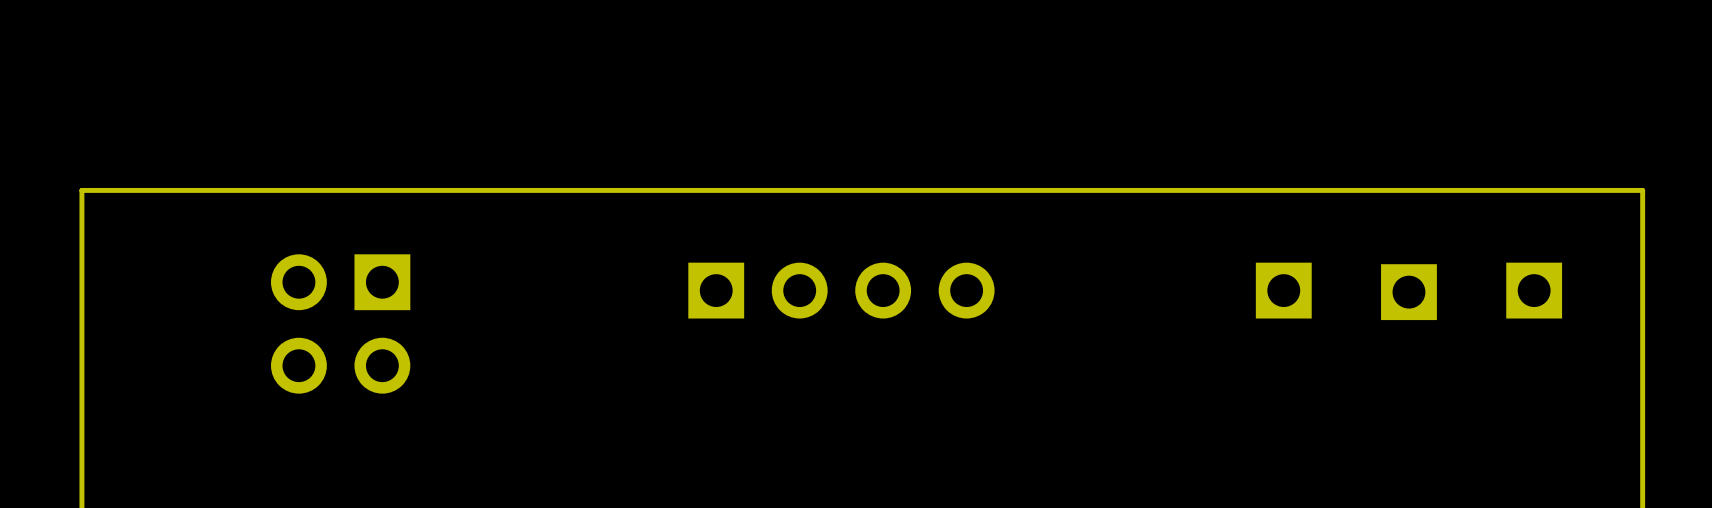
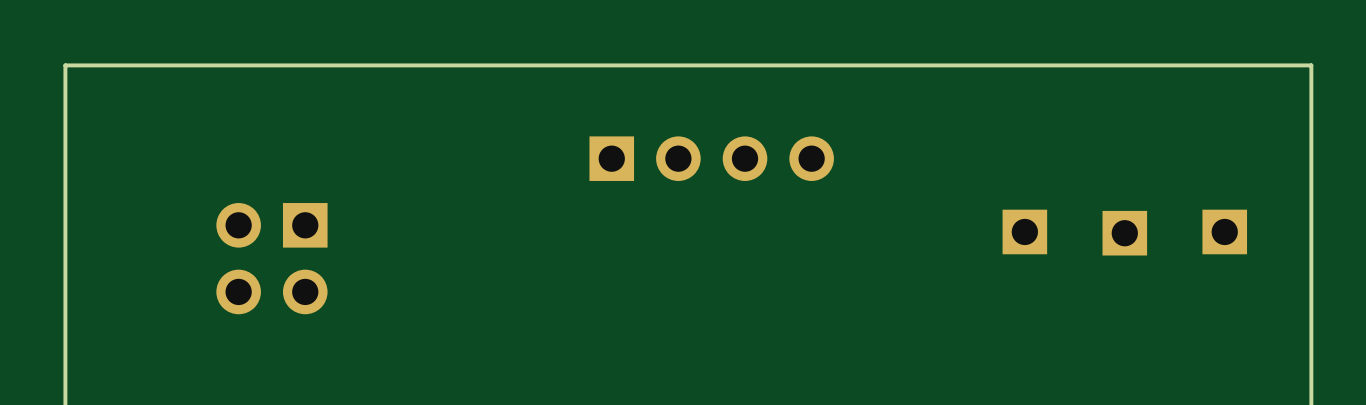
board edge: (1642, 190) (81, 190) -> (1311, 152) (1311, 65) (65, 65) (65, 152)
part position: (841, 290) -> (711, 158)

